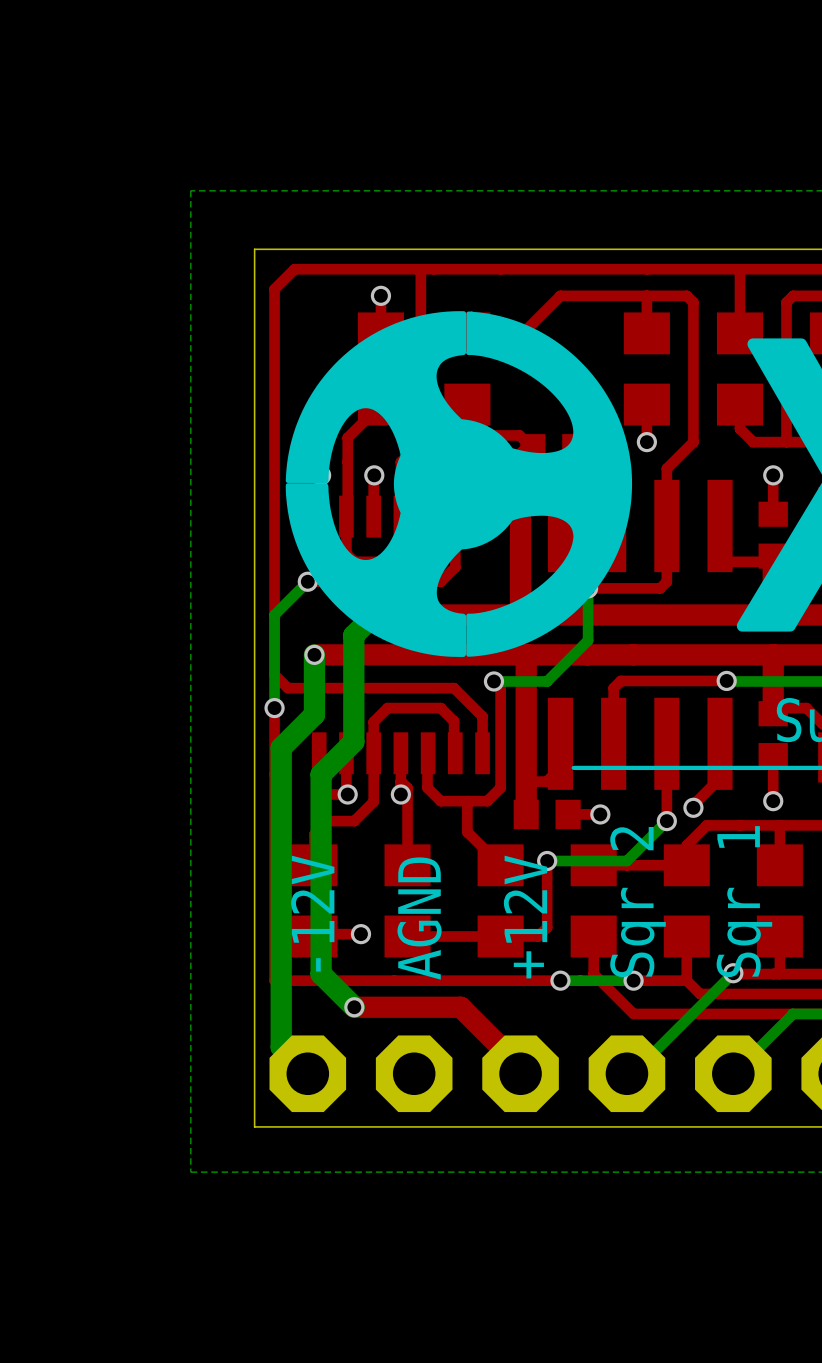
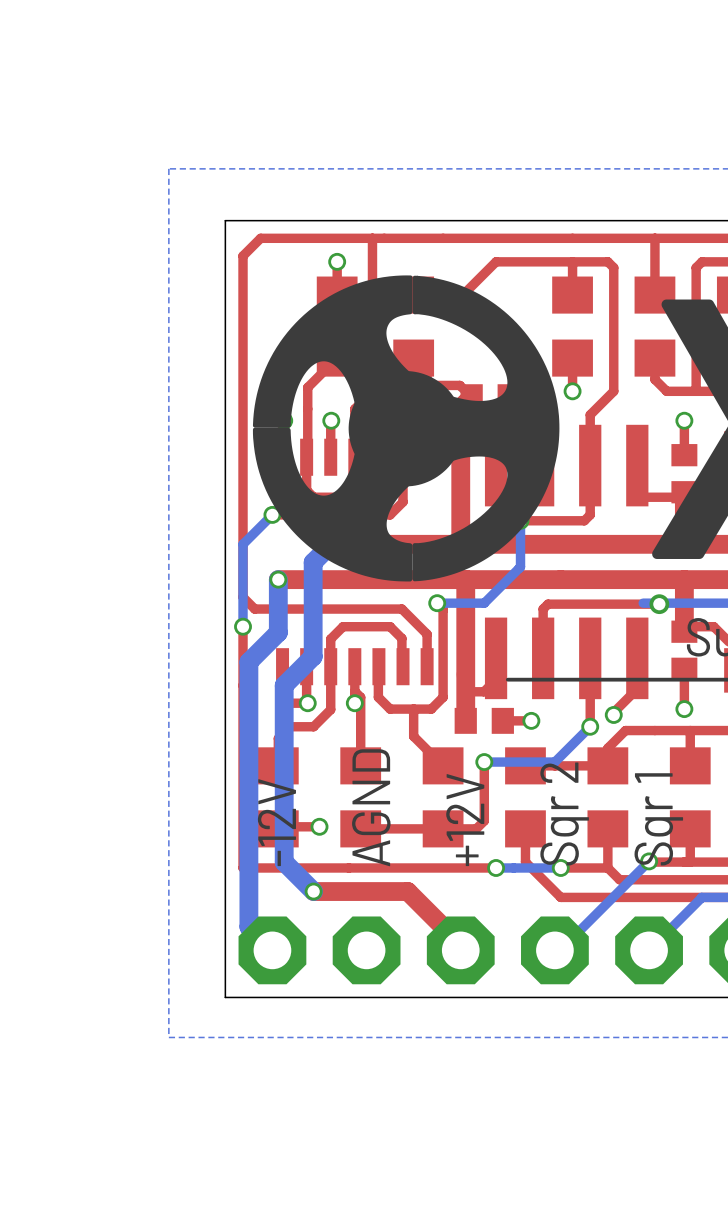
top track: (726, 680) (620, 680) (619, 682) -> (659, 604) (548, 604)
via position: (726, 680) -> (659, 604)

